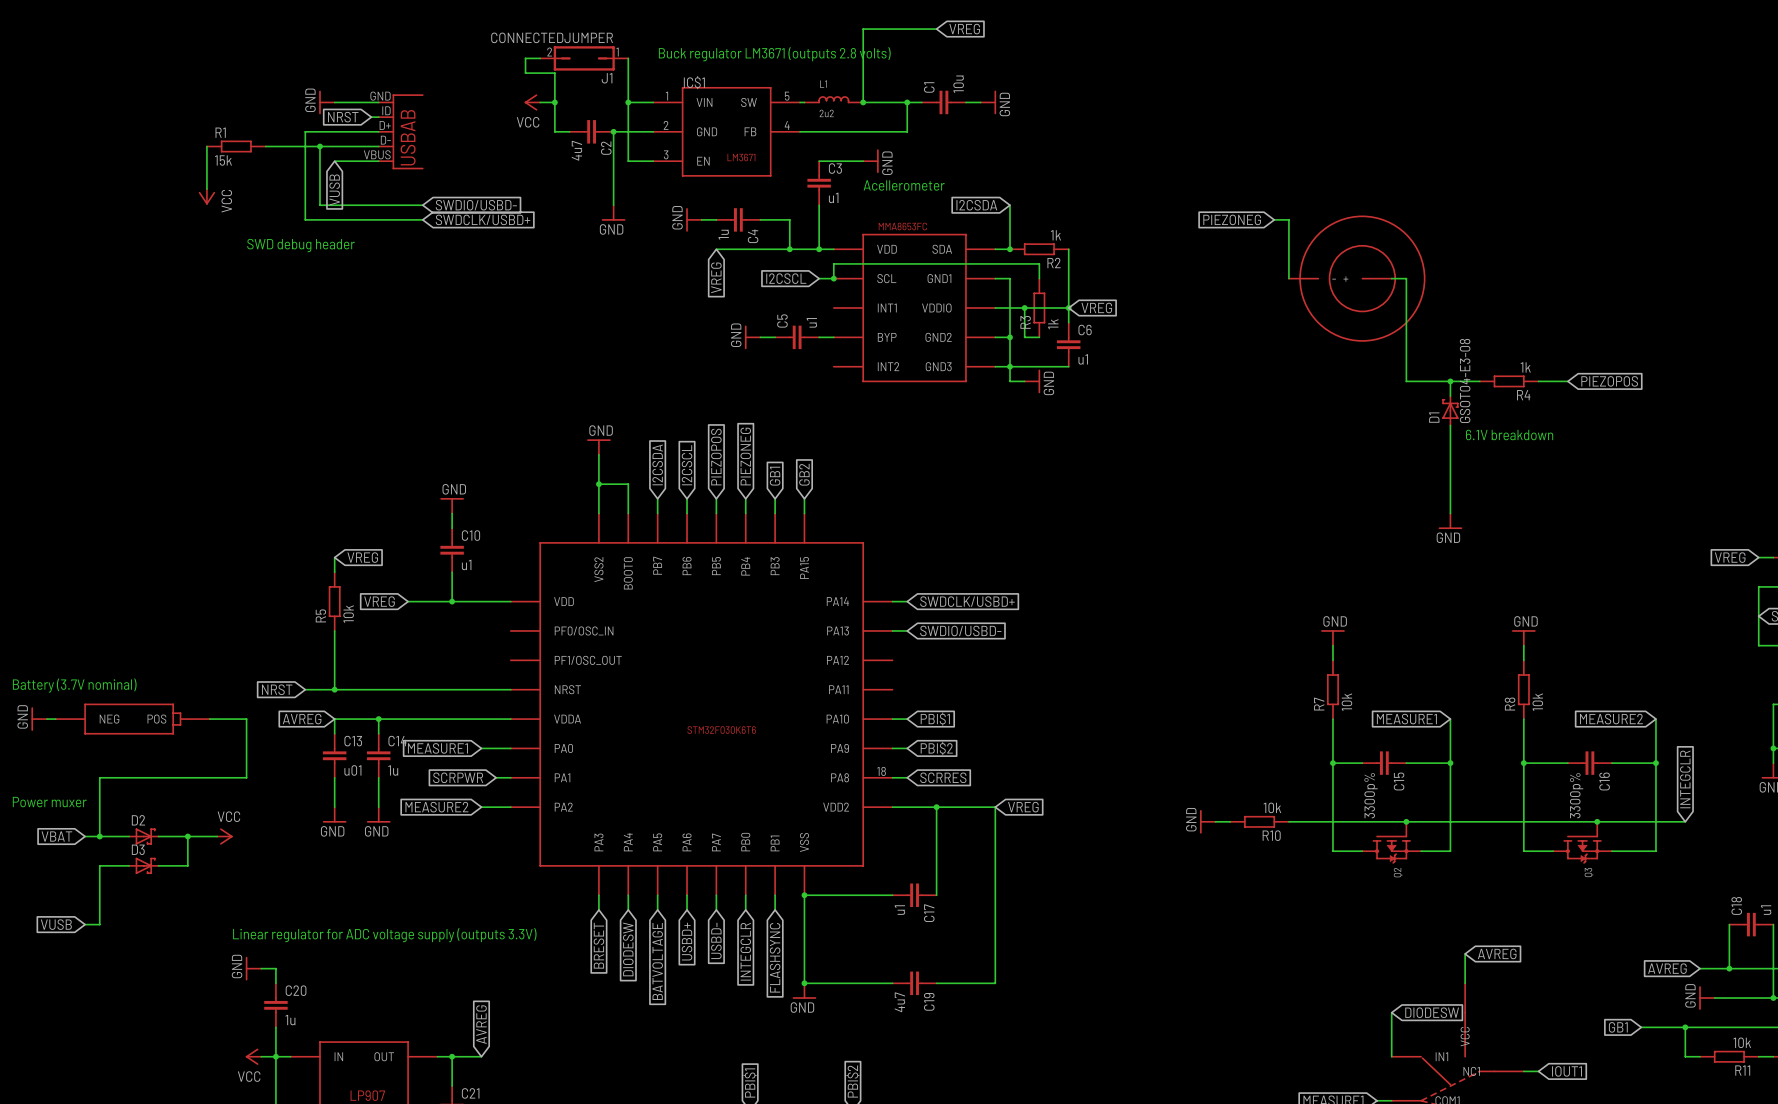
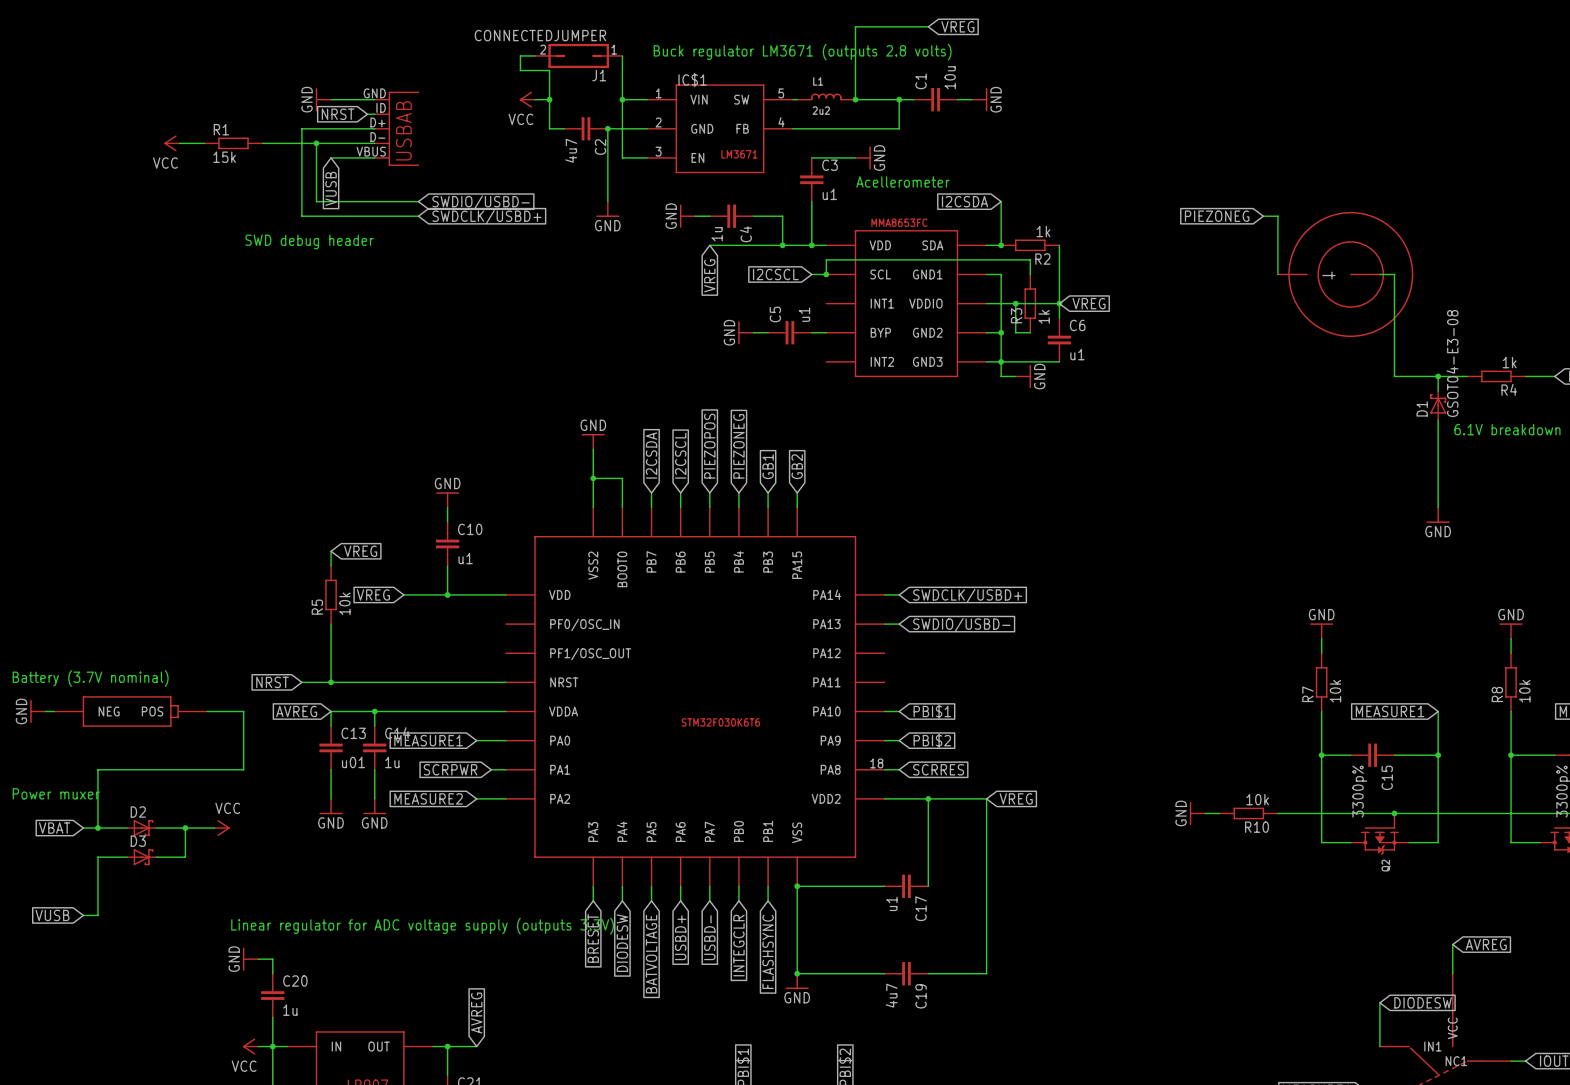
wire: (206, 146) (206, 189) -> (204, 143) (179, 143)
power symbol position: VCC (206, 196) -> VCC (171, 143)
power symbol rotation: 0° (206, 198) -> 90° clockwise (170, 143)

